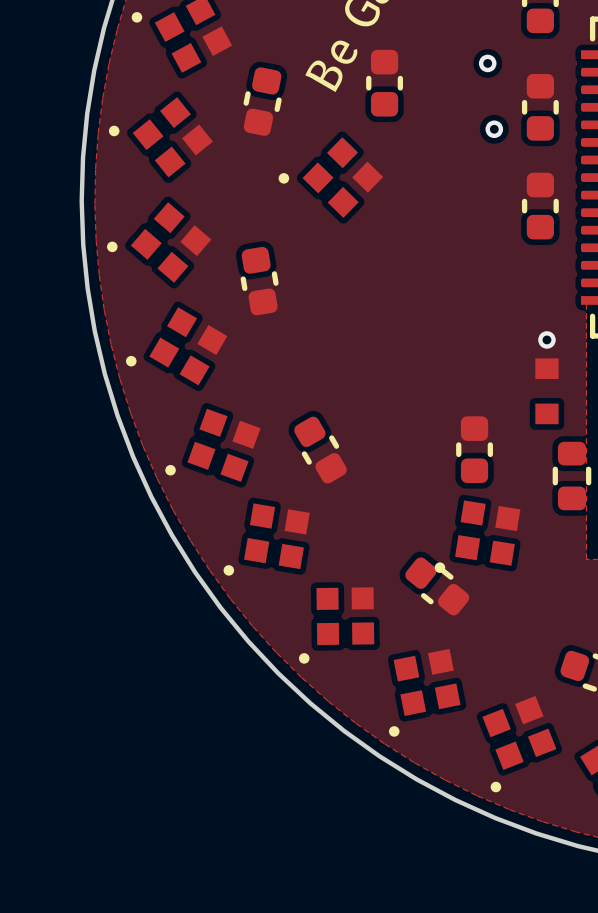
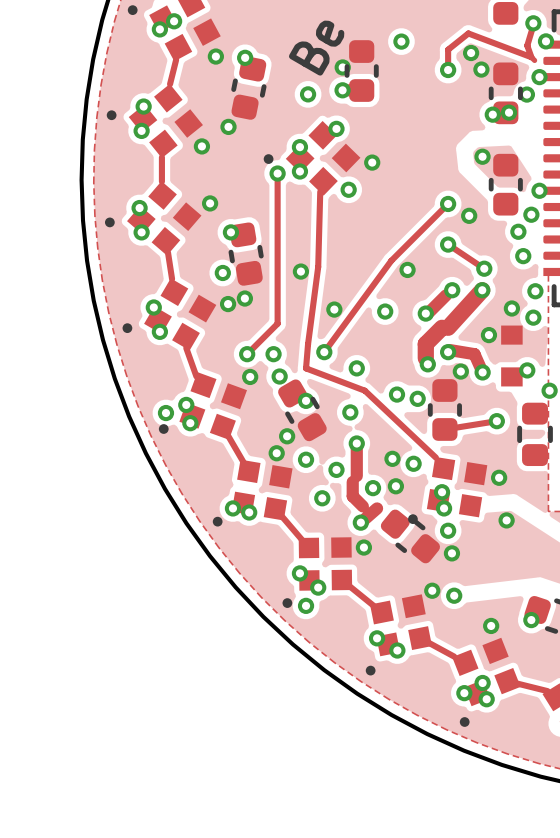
via: none -> (174, 21)
via: none -> (533, 23)
track: none -> (533, 25) (527, 45) (531, 57)
via: none -> (159, 29)
via: none -> (401, 41)
via: none -> (545, 41)
via position: (487, 63) -> (471, 53)
via: none -> (215, 56)
via: none -> (245, 57)
track: none -> (531, 57) (468, 33) (448, 49) (448, 70)
track: none -> (531, 57) (534, 60)
track: none -> (176, 59) (170, 84)
via: none -> (342, 67)
via: none -> (481, 69)
via: none -> (448, 70)
via: none -> (539, 77)
via: none -> (342, 90)
via: none -> (308, 94)
via: none -> (526, 94)
via: none -> (143, 106)
via: none -> (509, 112)
via: (494, 129) -> none
via: none -> (492, 114)
via: none -> (228, 126)
via: none -> (336, 128)
via: none -> (141, 130)
via: none -> (201, 146)
via: none -> (299, 147)
via: none -> (482, 156)
track: none -> (161, 157) (161, 181)
via: none -> (372, 162)
via: none -> (299, 171)
track: none -> (277, 173) (277, 323) (247, 354)
via: none -> (277, 173)
via: none -> (348, 189)
via: none -> (539, 190)
track: none -> (320, 191) (318, 266) (306, 368) (364, 390) (435, 457)
via: none -> (210, 203)
track: none -> (448, 203) (391, 260) (324, 352)
via: none -> (448, 203)
via: none -> (139, 208)
via: none -> (531, 214)
via: none -> (469, 215)
via: none -> (518, 231)
via: none -> (141, 232)
via: none -> (230, 232)
track: none -> (448, 244) (484, 268)
via: none -> (448, 244)
track: none -> (168, 252) (172, 279)
via: none -> (523, 256)
via: none -> (484, 268)
via: none -> (407, 269)
via: none -> (300, 271)
via: none -> (222, 272)
via: none -> (452, 290)
track: none -> (482, 290) (448, 327)
via: none -> (482, 290)
via: none -> (535, 291)
track: none -> (446, 295) (427, 313)
via: none -> (244, 298)
via: none -> (228, 304)
via: none -> (153, 307)
via: none -> (334, 309)
via: none -> (385, 311)
via: none -> (425, 313)
via: none -> (533, 317)
track: none -> (442, 327) (425, 344) (425, 358)
via: none -> (159, 331)
via: none -> (488, 335)
track: none -> (186, 348) (196, 376)
track: none -> (450, 350) (474, 354) (482, 372)
via: none -> (324, 352)
via: none -> (448, 352)
via: none -> (247, 354)
via: none -> (273, 354)
via: none -> (427, 364)
via: none -> (356, 368)
via: none -> (527, 370)
via: none -> (460, 371)
via: none -> (482, 372)
via: none -> (250, 376)
via: none -> (279, 376)
via: none -> (549, 390)
via: none -> (397, 394)
via: none -> (417, 398)
via: none -> (306, 400)
via: none -> (186, 404)
via: none -> (165, 413)
via: none -> (350, 412)
track: none -> (496, 421) (444, 429)
via: none -> (496, 421)
via: none -> (190, 423)
track: none -> (222, 426) (248, 471)
via: none -> (287, 436)
track: none -> (356, 443) (356, 475)
via: none -> (356, 443)
via: none -> (276, 453)
via: none -> (392, 458)
via: none -> (306, 459)
via: none -> (413, 463)
via: none -> (336, 469)
via: none -> (499, 477)
track: none -> (352, 482) (352, 496) (362, 506)
via: none -> (395, 486)
via: none -> (373, 488)
via: none -> (442, 492)
via: none -> (322, 498)
via: none -> (232, 508)
track: none -> (275, 508) (308, 547)
track: none -> (377, 508) (360, 522)
via: none -> (444, 508)
via: none -> (249, 512)
via: none -> (506, 520)
via: none -> (360, 522)
via: none -> (448, 530)
via: none -> (363, 547)
via: none -> (451, 553)
via: none -> (299, 573)
track: none -> (341, 580) (381, 612)
via: none -> (318, 587)
via: none -> (432, 590)
via: none -> (454, 595)
via: none -> (306, 605)
via: none -> (531, 620)
via: none -> (491, 625)
via: none -> (377, 638)
track: none -> (420, 638) (454, 656)
via: none -> (397, 650)
track: none -> (507, 681) (547, 691)
via: none -> (482, 683)
via: none -> (464, 693)
via: none -> (486, 699)

